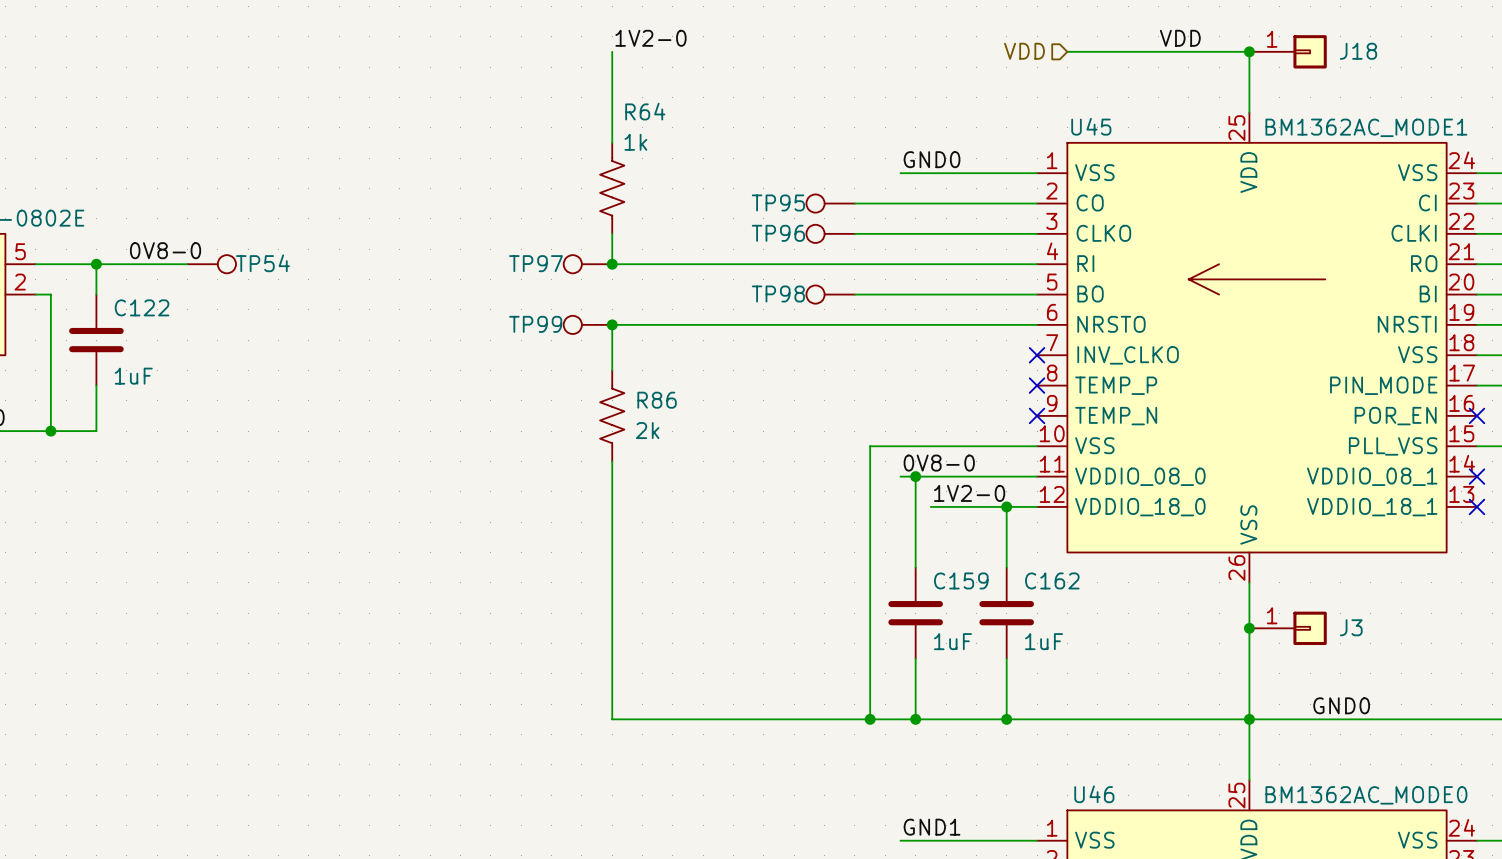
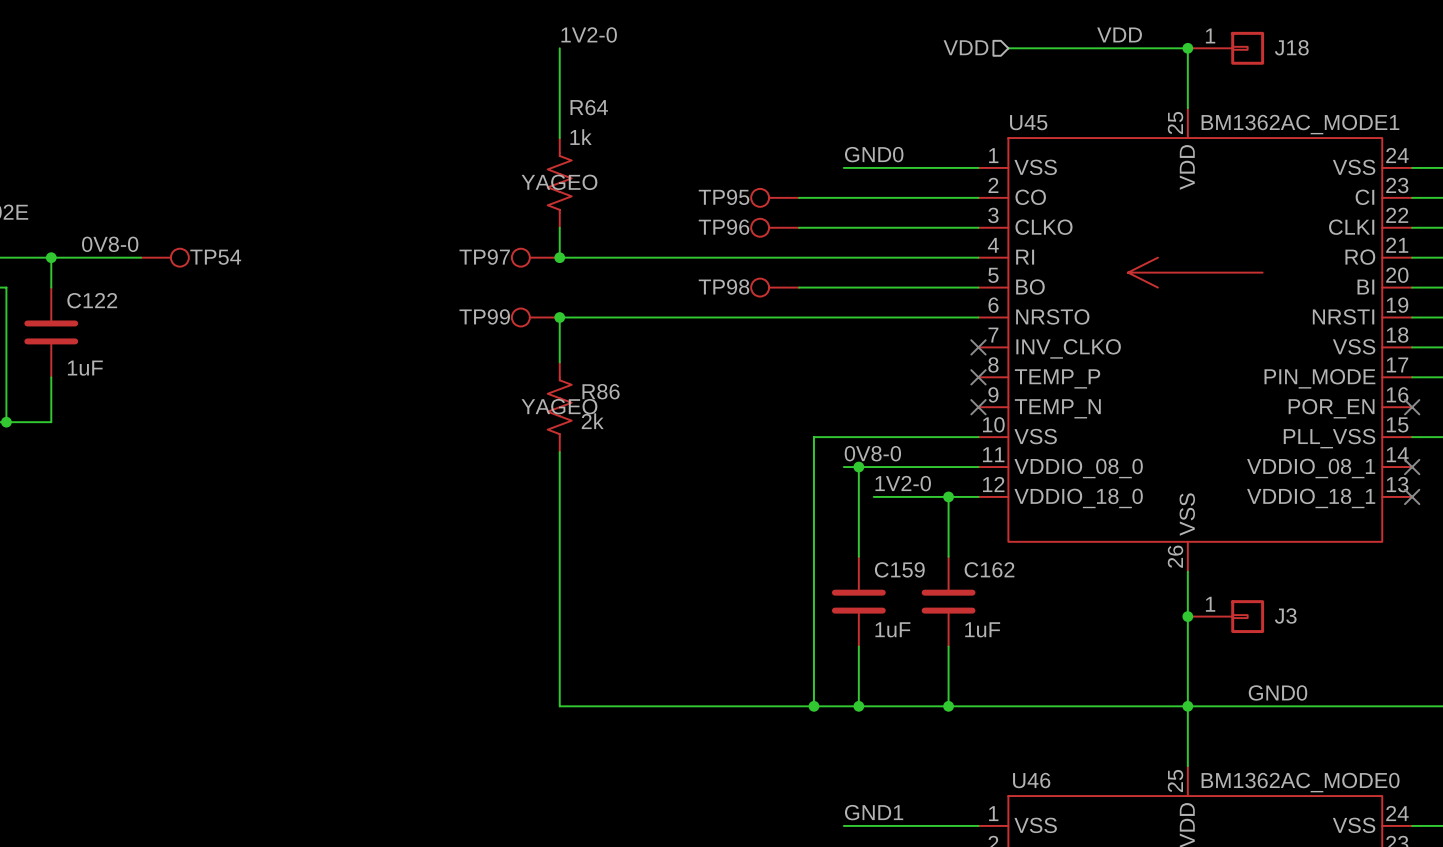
R64 text: none -> YAGEO (559, 182)
R86 text: none -> YAGEO (559, 406)

